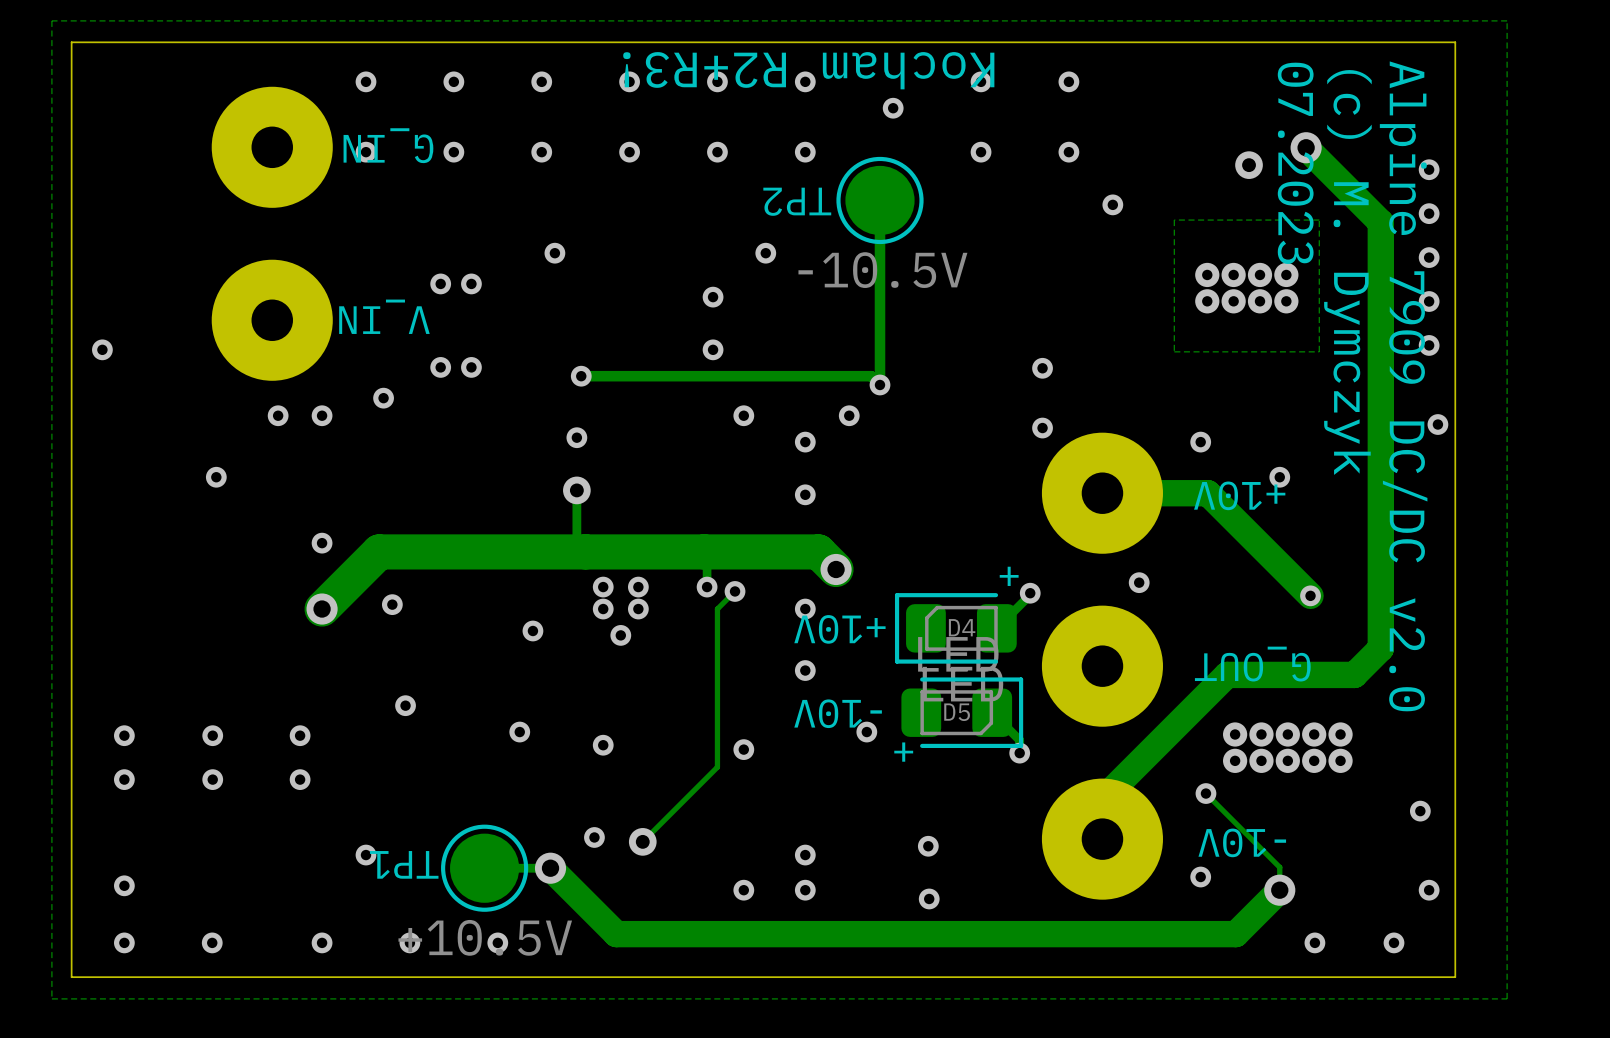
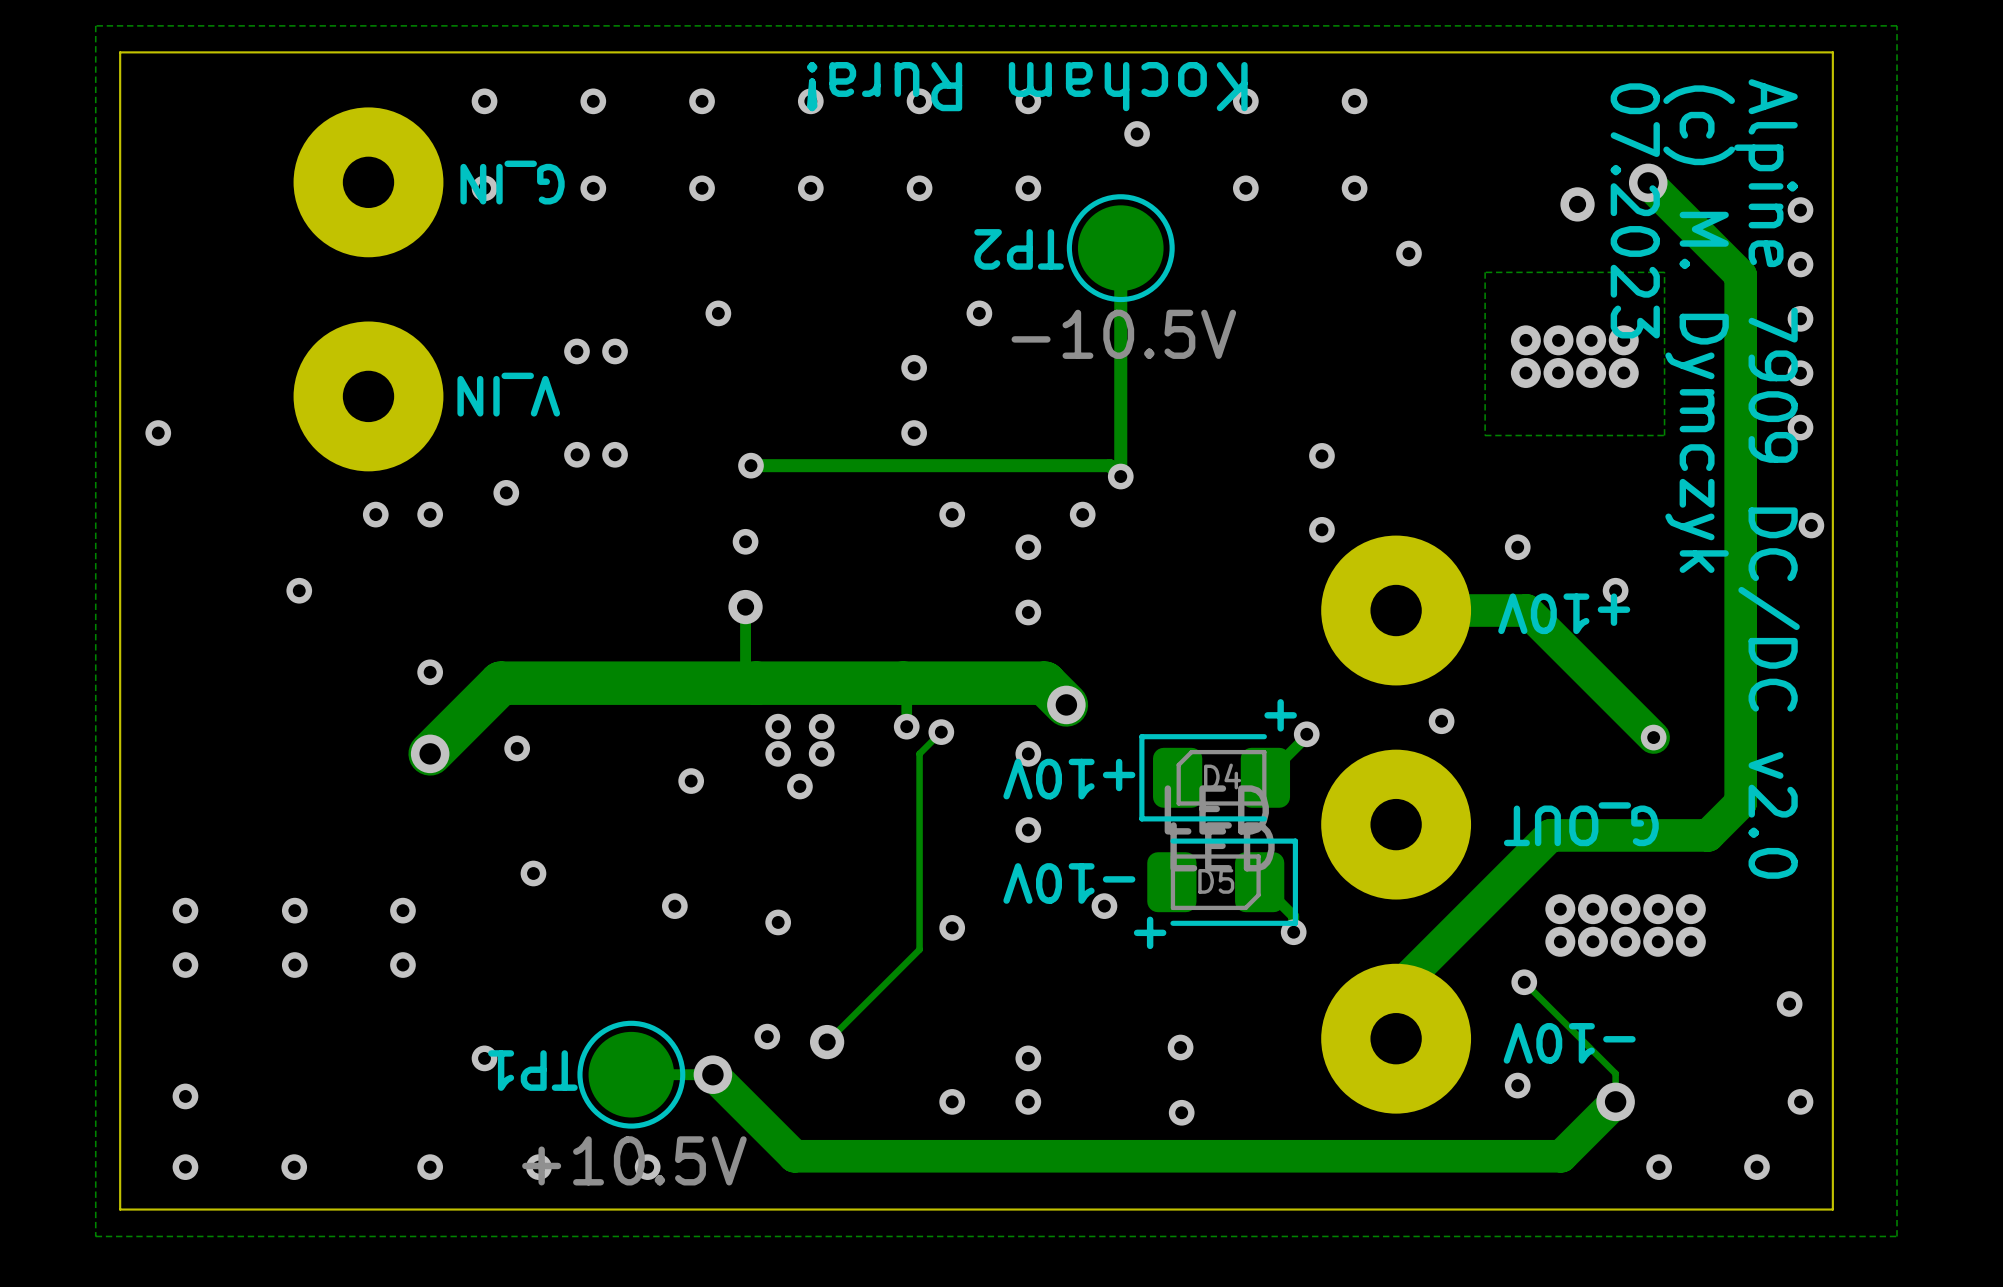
text: Kocham R2+R3! (808, 70) -> Kocham Rura! (1027, 86)

